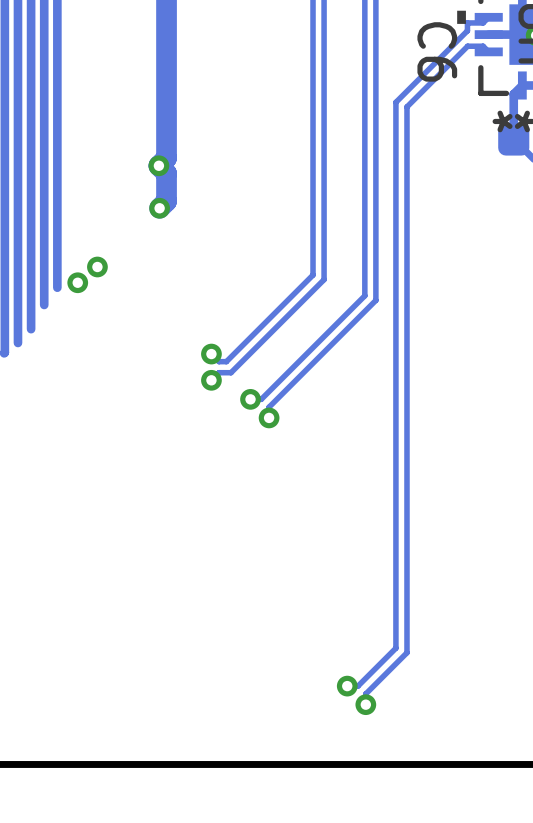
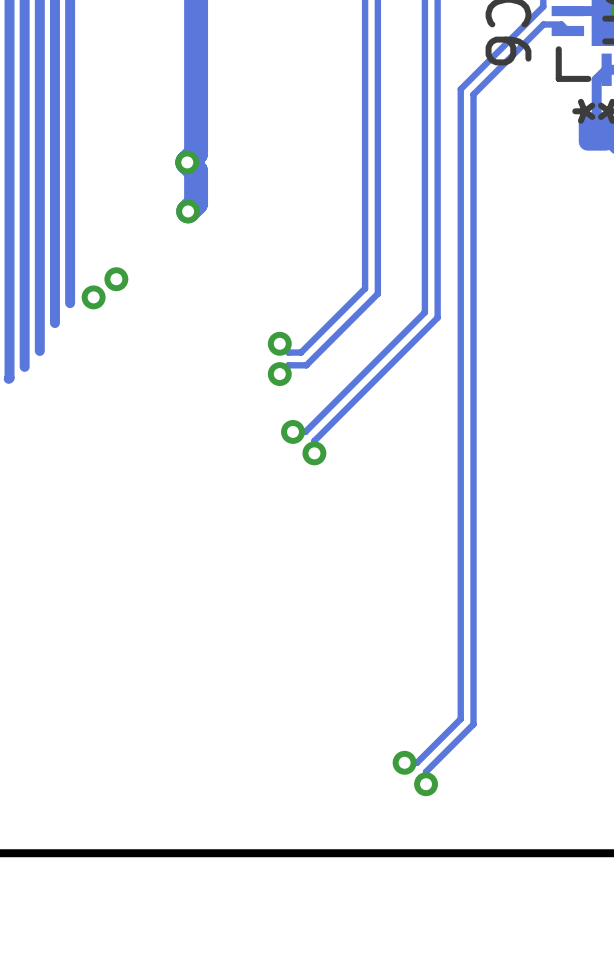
via: none -> (279, 343)
track: (257, 330) (226, 361) (219, 361) (211, 354) -> (301, 352) (288, 352) (279, 343)
track: (262, 341) (231, 372) (219, 372) (211, 380) -> (306, 365) (288, 365) (279, 374)
via: none -> (279, 374)
via: (211, 354) -> none
via: (211, 380) -> none

